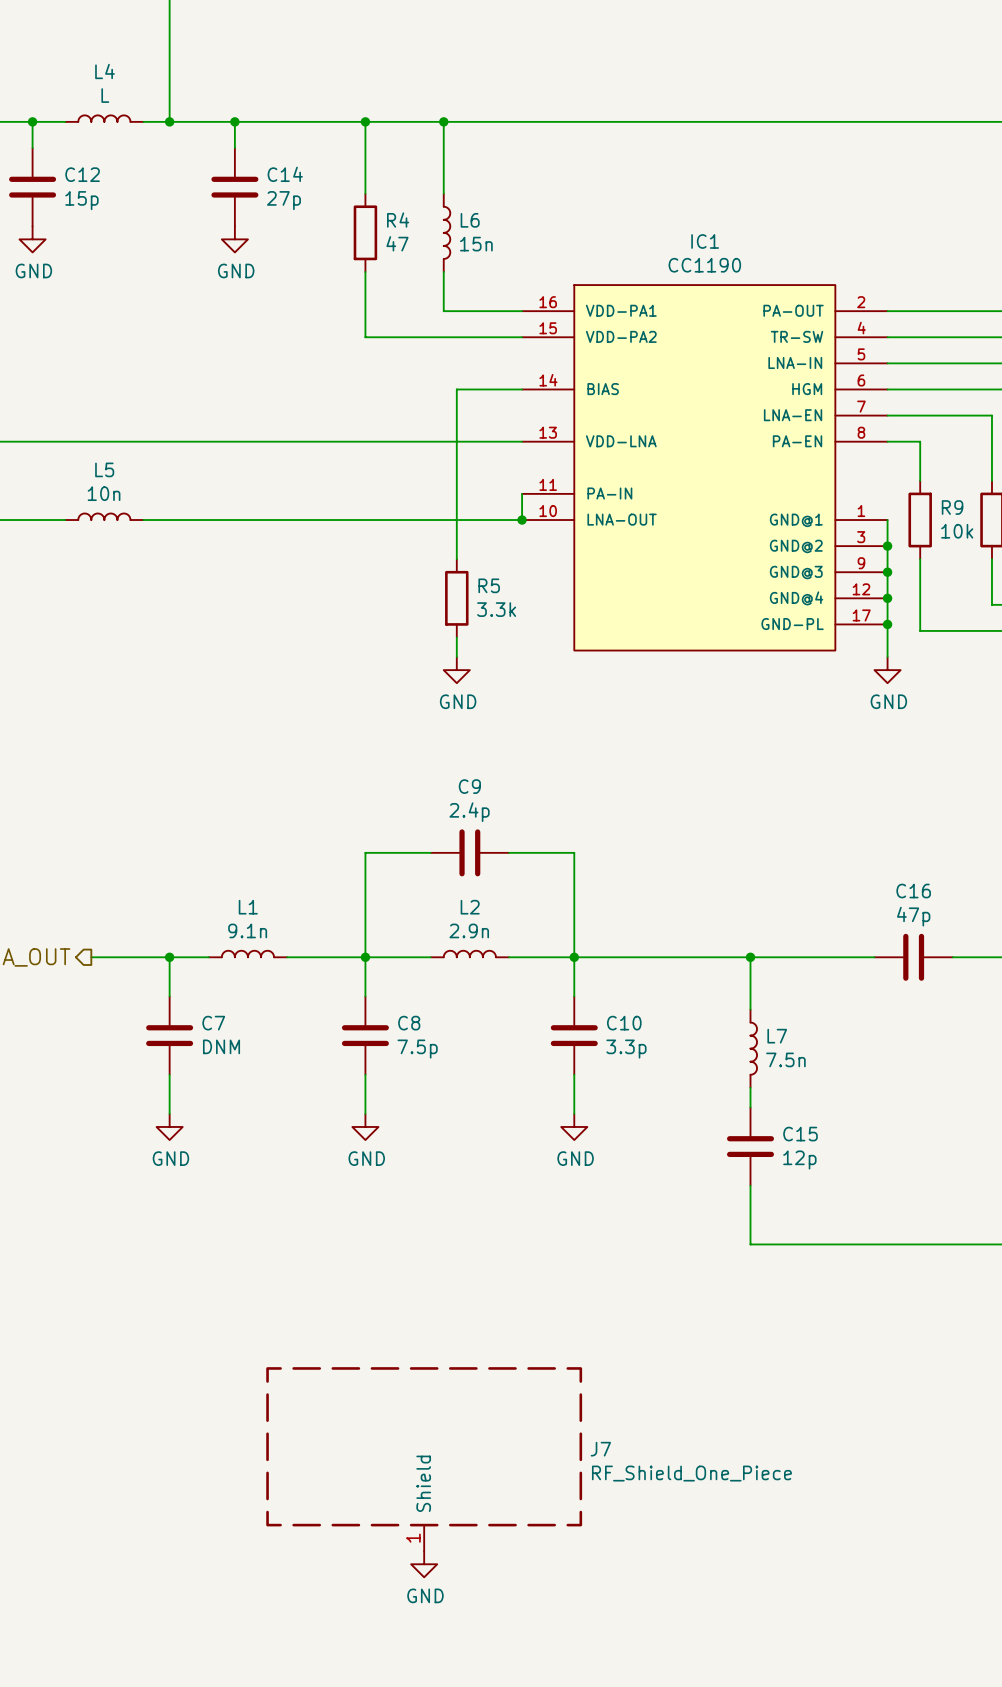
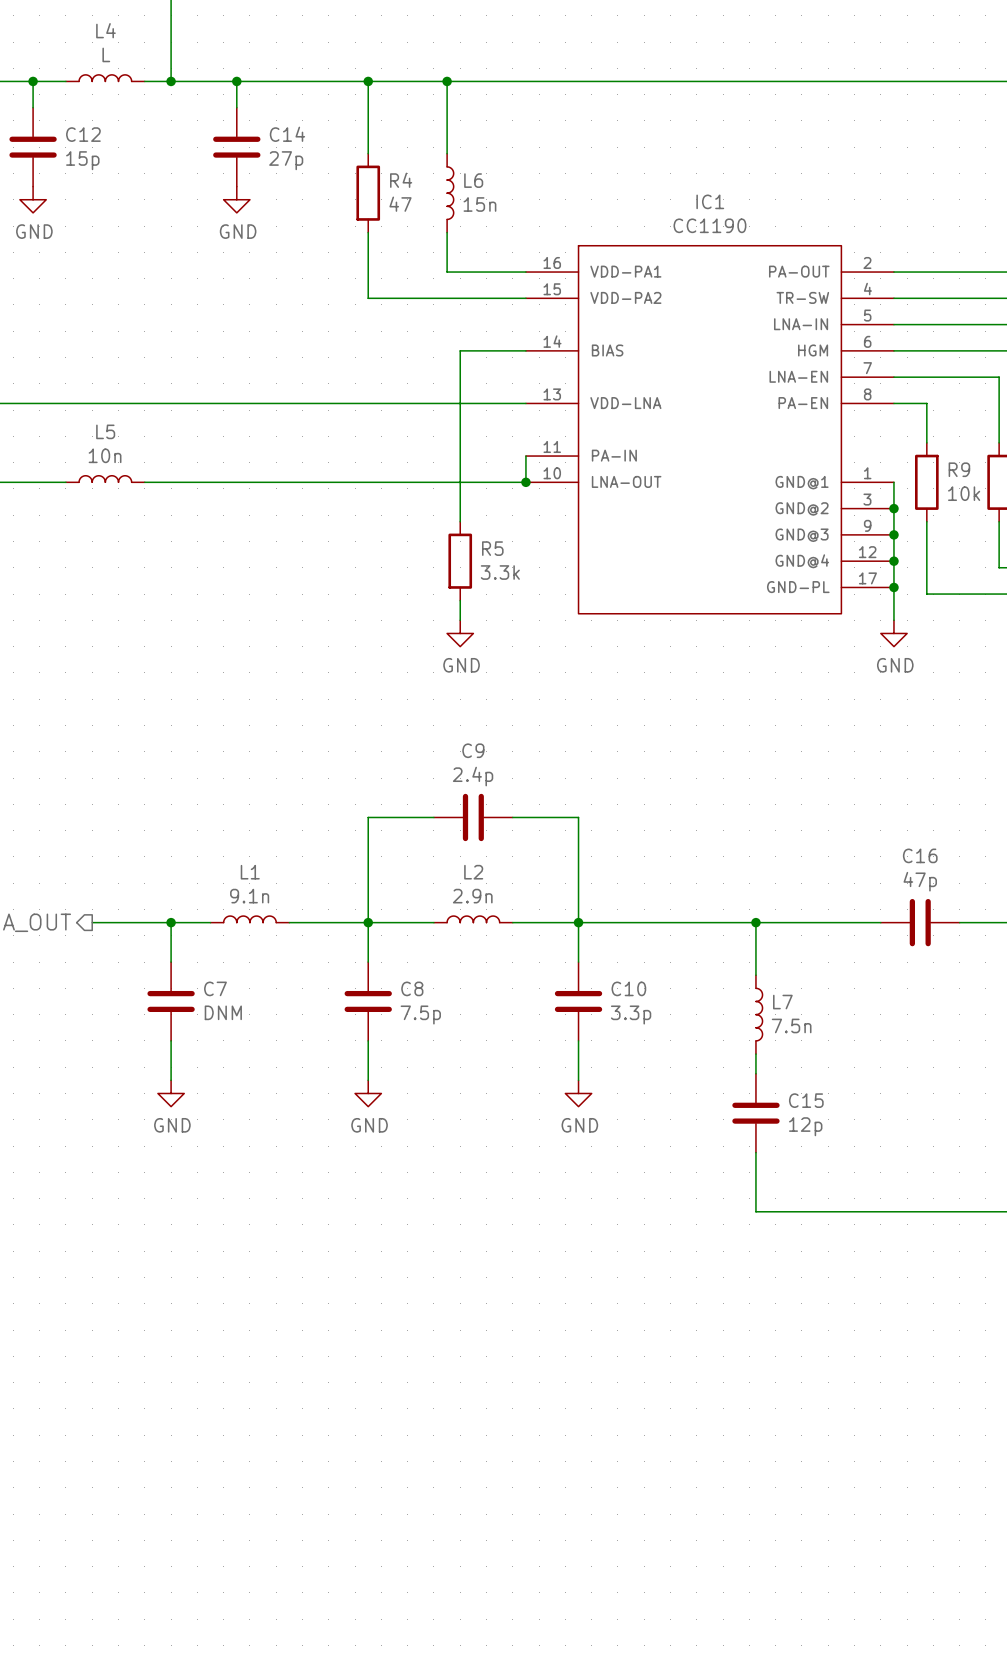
J7: RF_Shield_One_Piece (424, 1459) -> none
power symbol: GND (424, 1564) -> none

